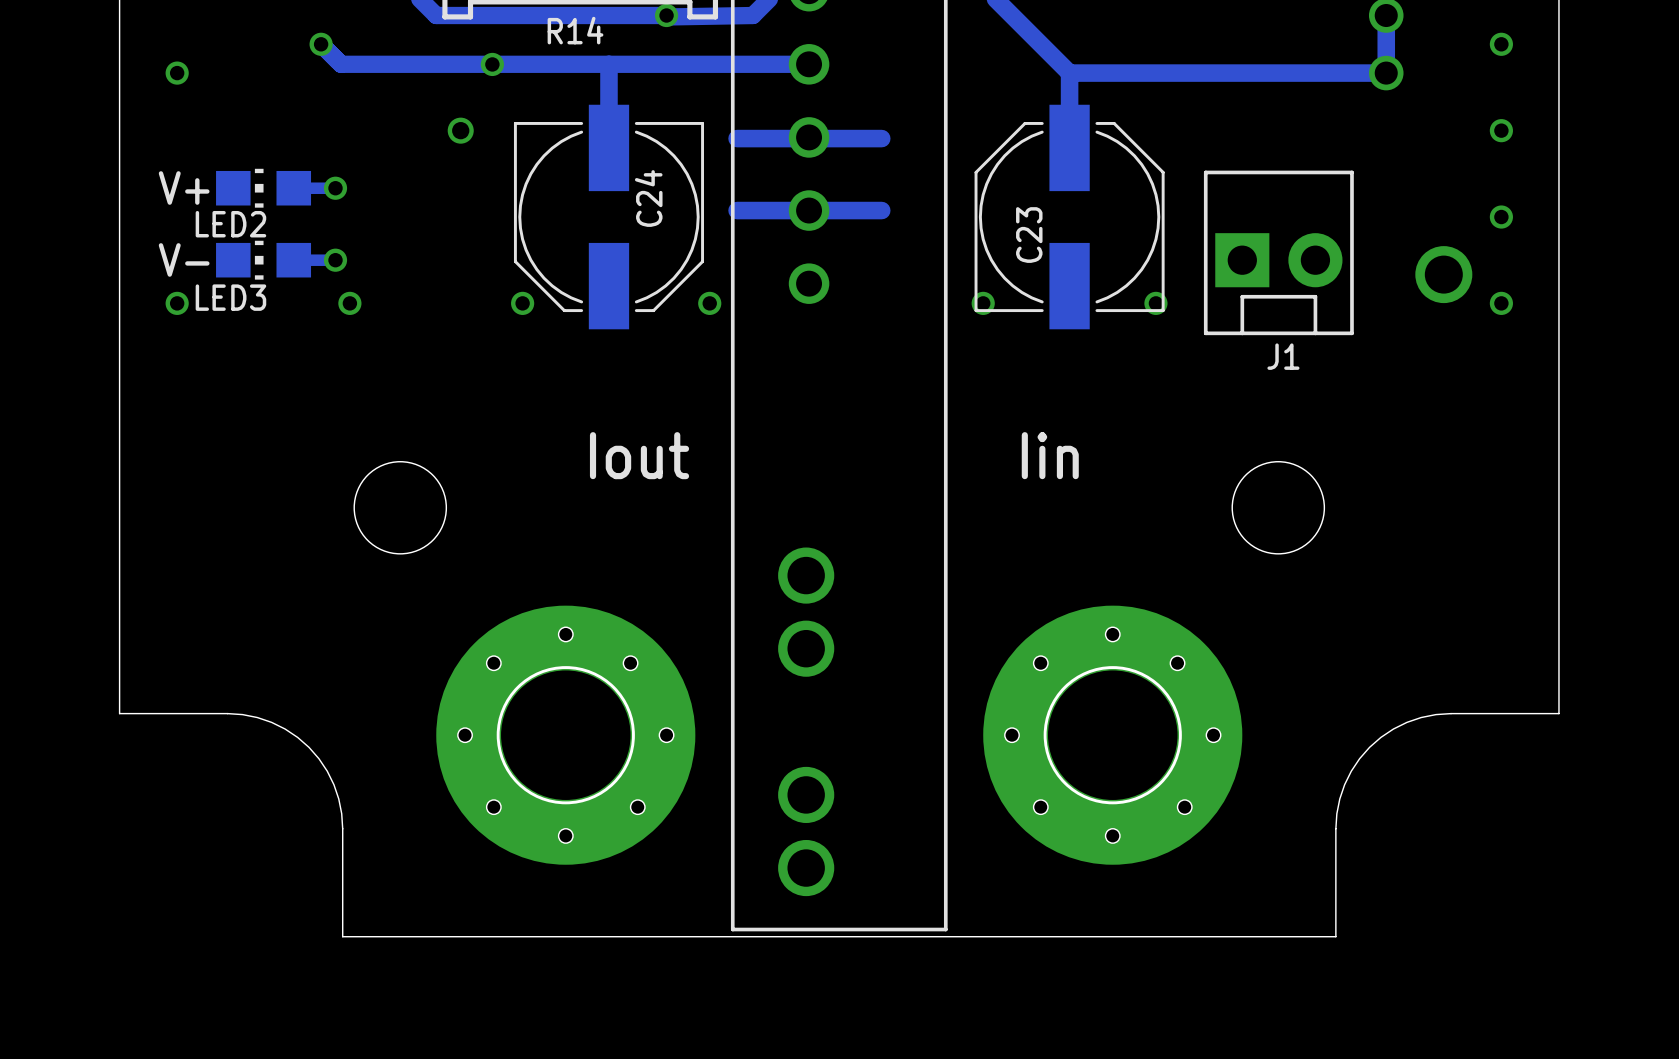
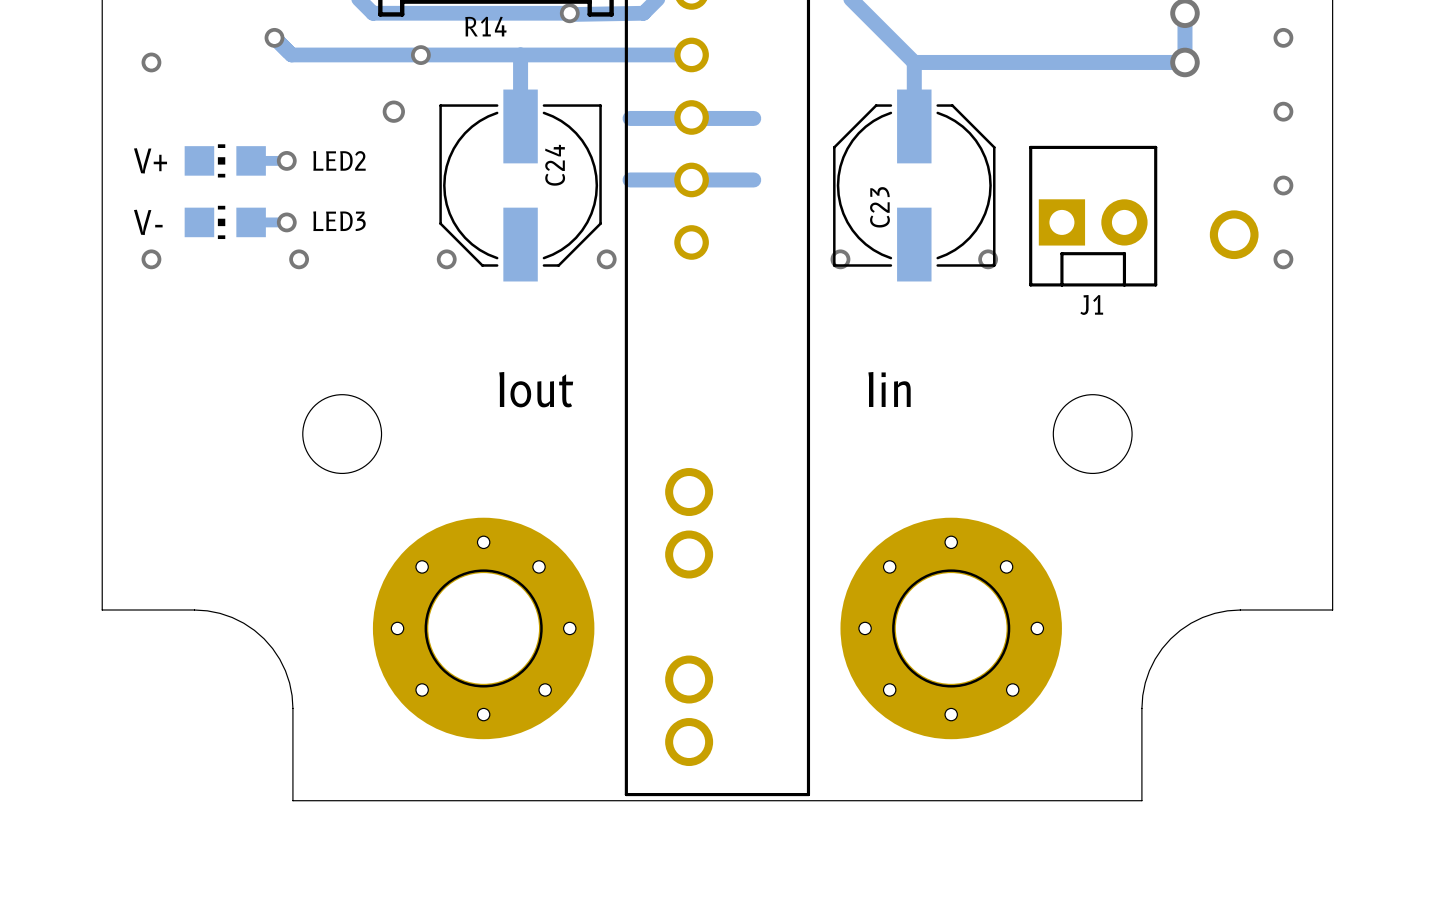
LED2 name position: LED2 (230, 224) -> LED2 (339, 160)
LED3 name position: LED3 (230, 297) -> LED3 (339, 221)

